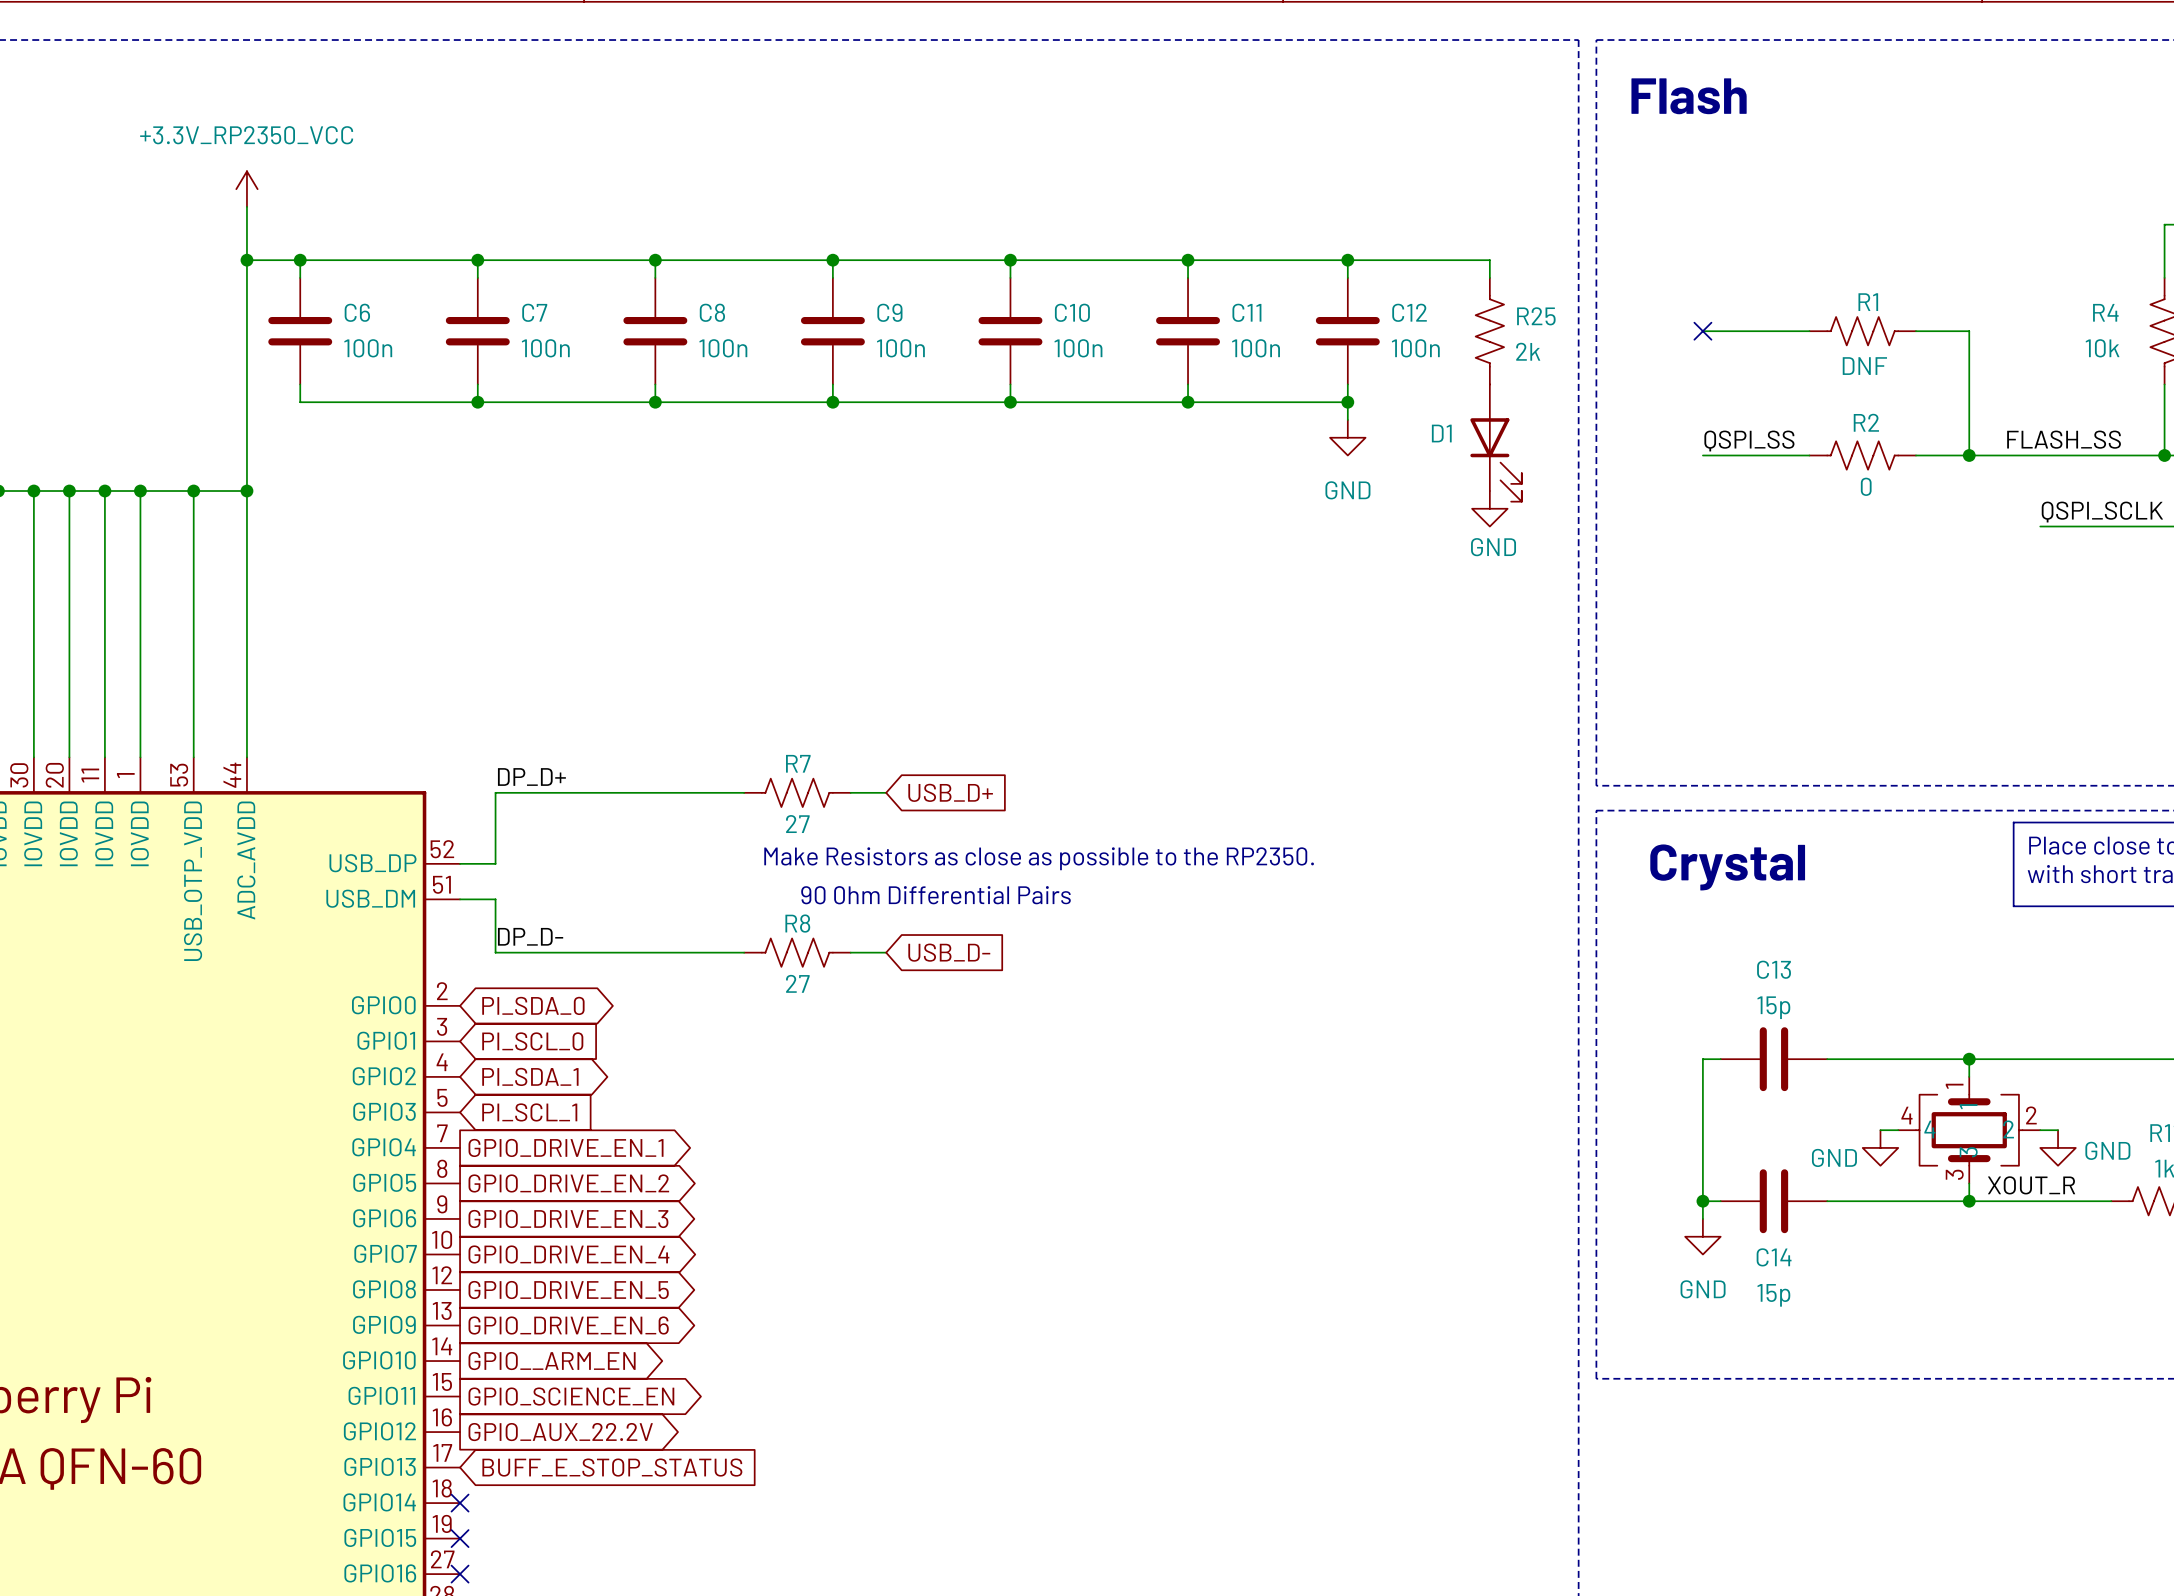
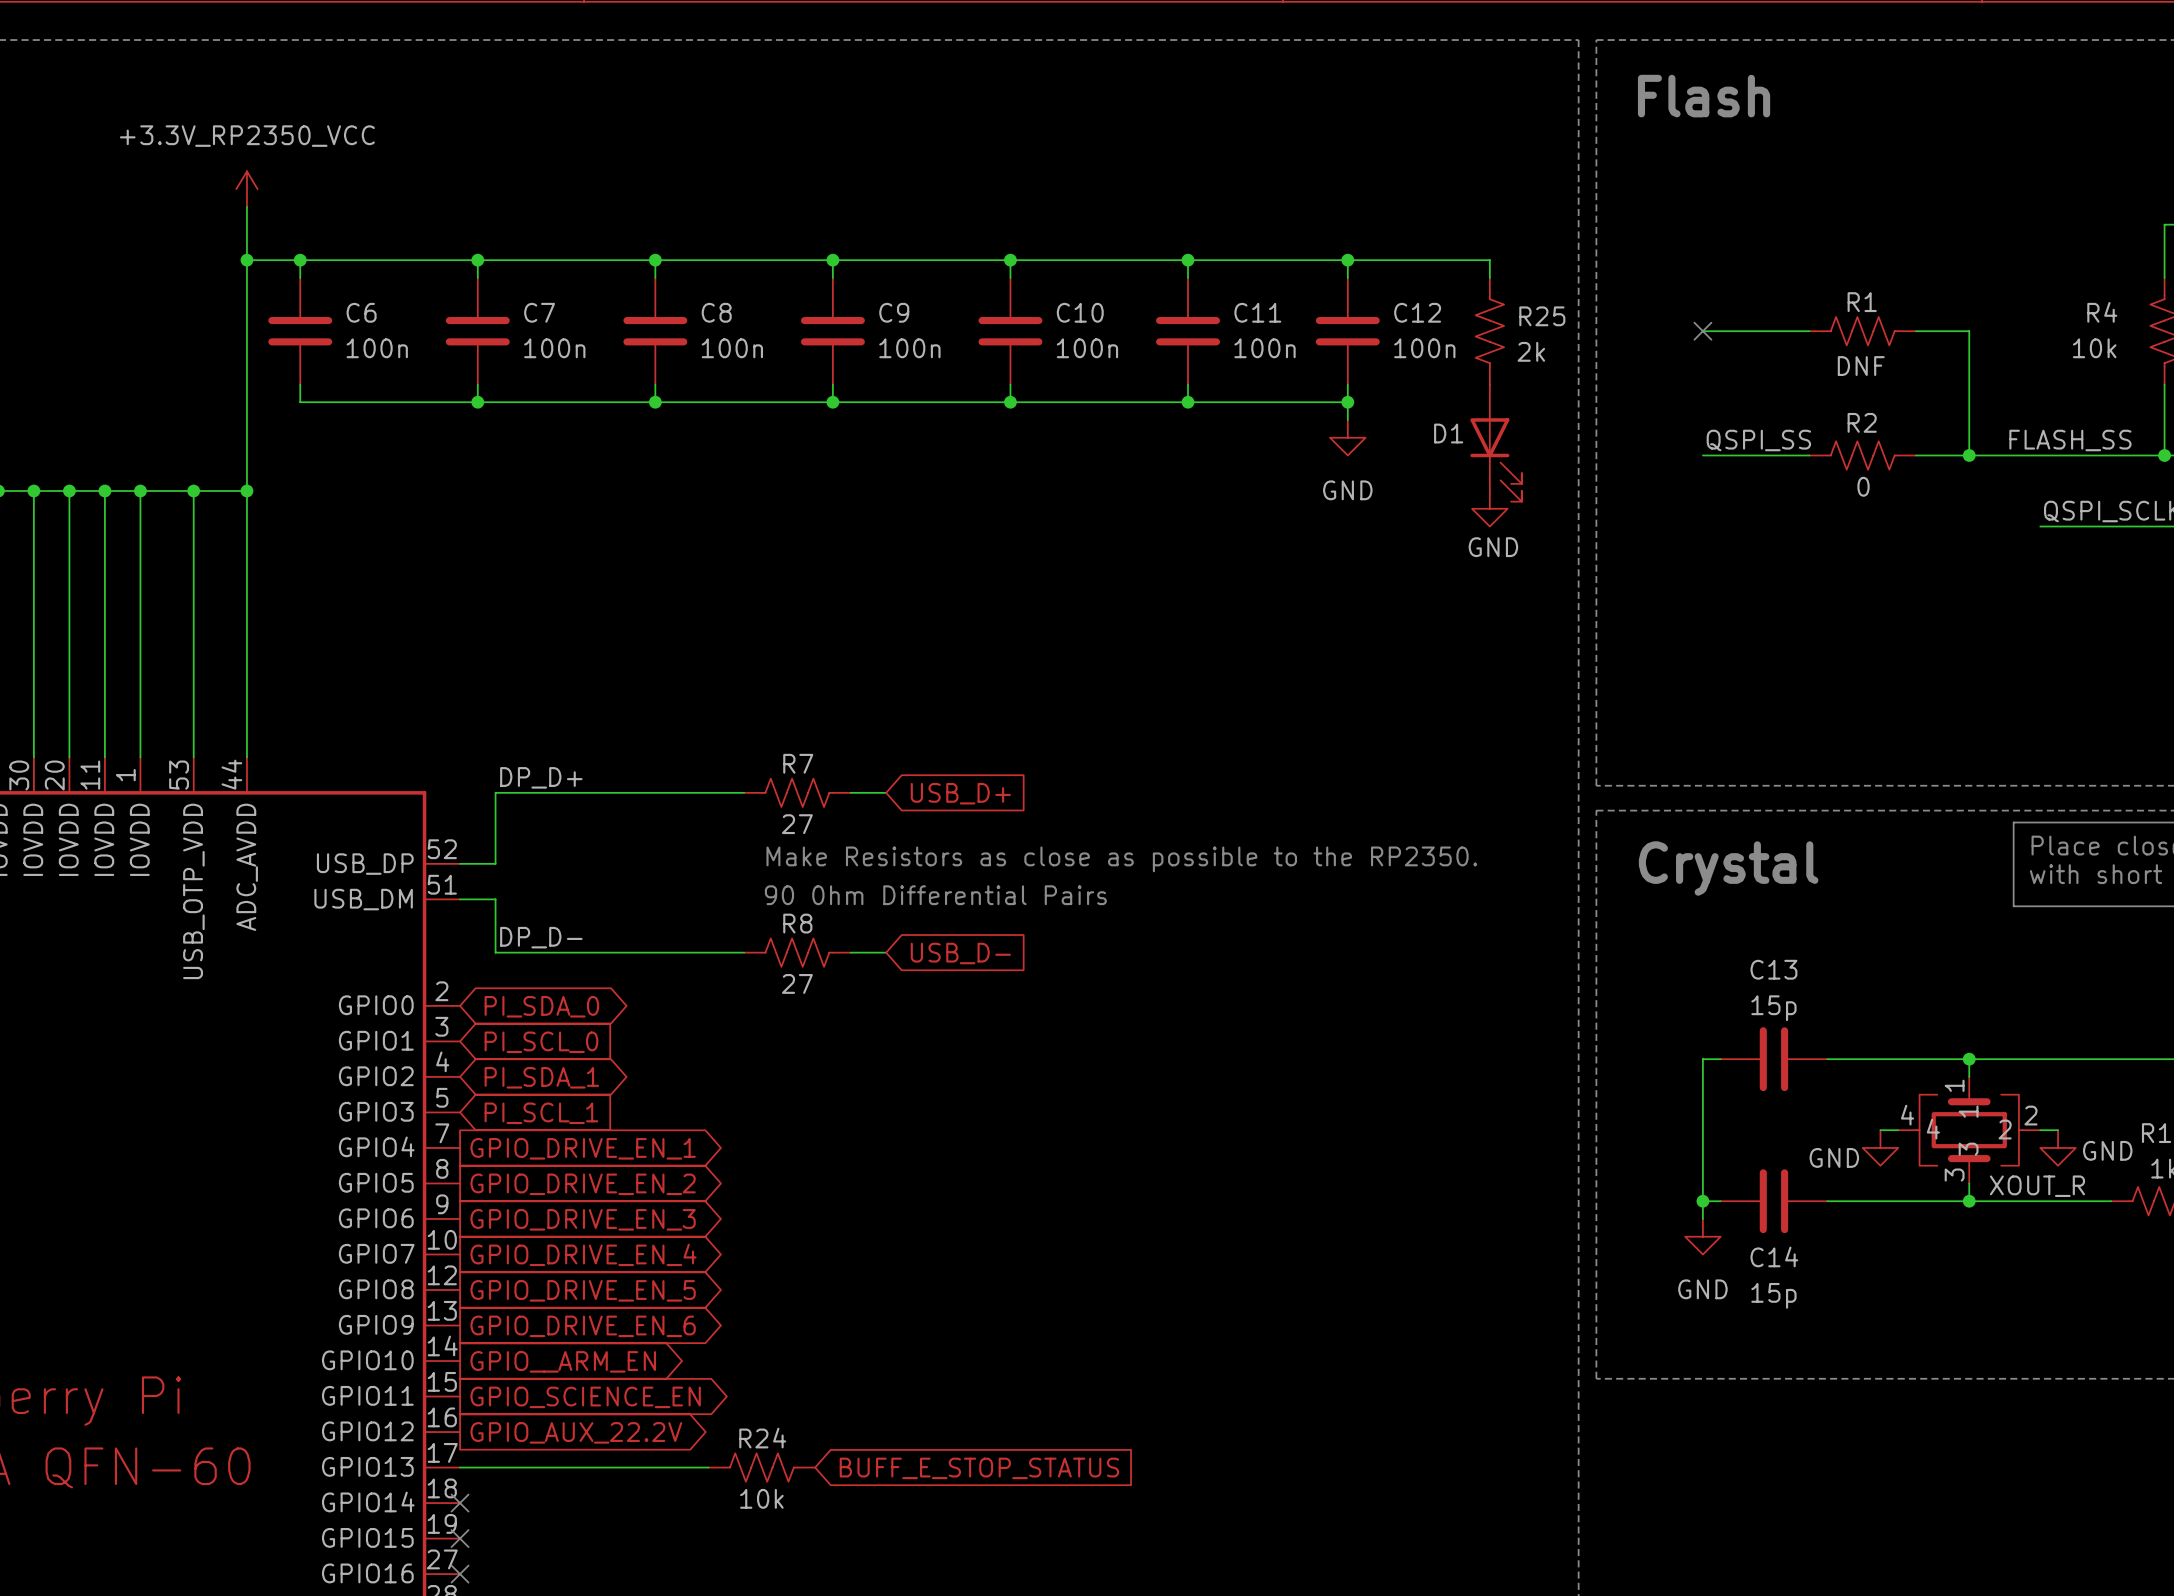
wire: none -> (460, 1467) (708, 1467)
global label: BUFF_E_STOP_STATUS (612, 1467) -> none
R24: none -> 10k (761, 1467)
global label: none -> BUFF_E_STOP_STATUS (979, 1468)

